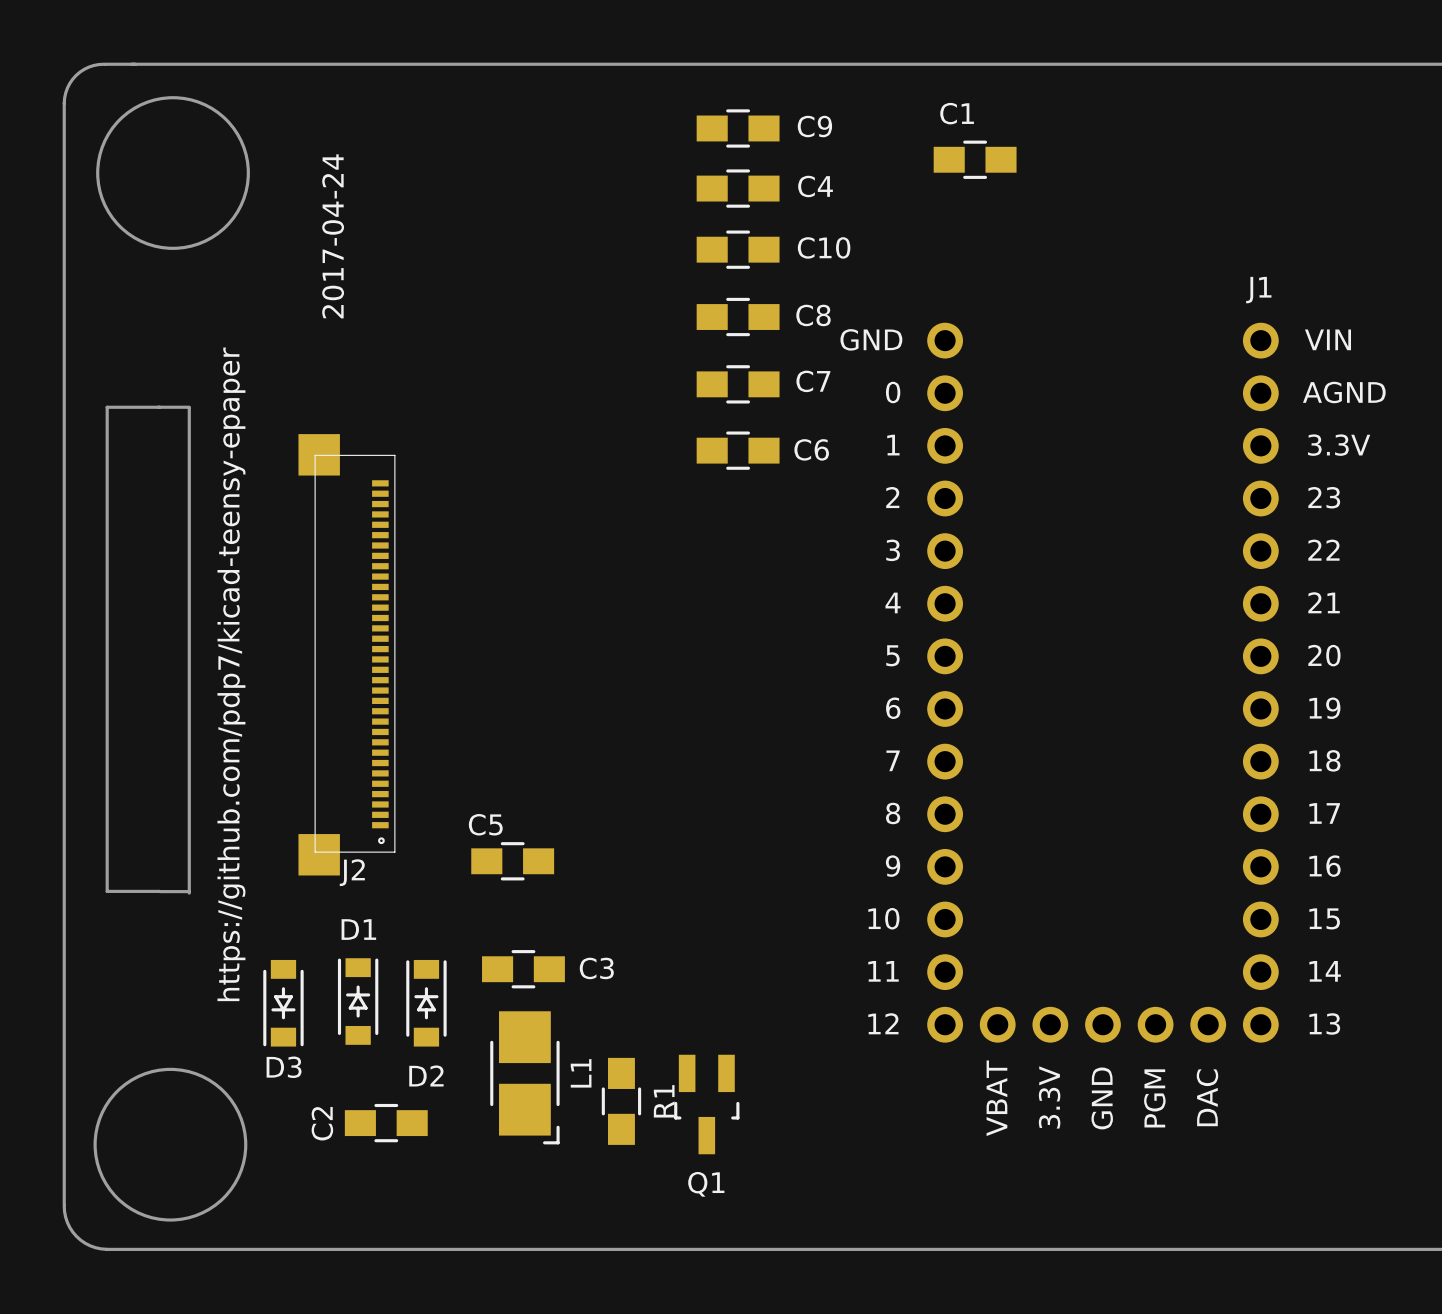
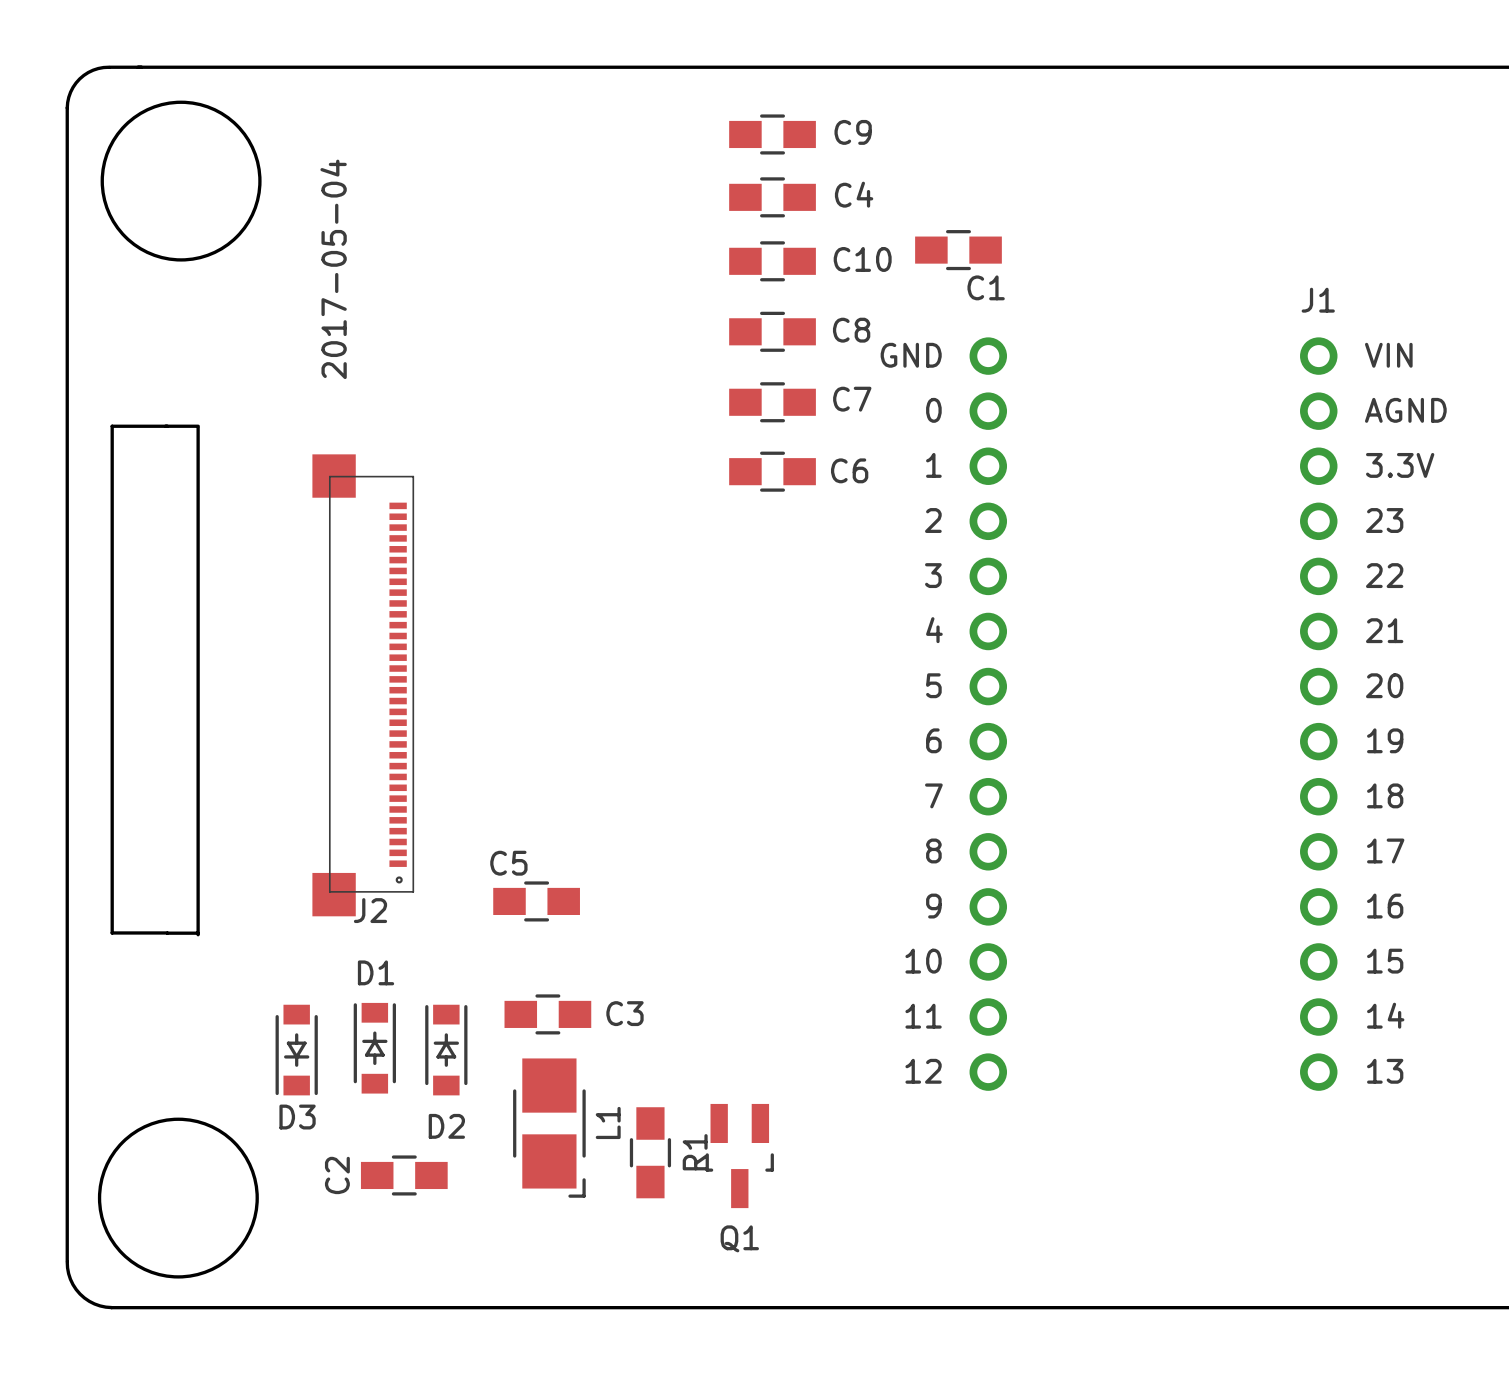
C1 name position: C1 (957, 113) -> C1 (986, 287)
C1 position: (975, 159) -> (958, 250)
text: 2017-04-24 (333, 236) -> 2017-05-04 (333, 269)
J1 footprint: [927, 322, 1279, 1043] -> [969, 337, 1338, 1091]
text: https://github.com/pdp7/kicad-teensy-epaper (231, 674) -> none

